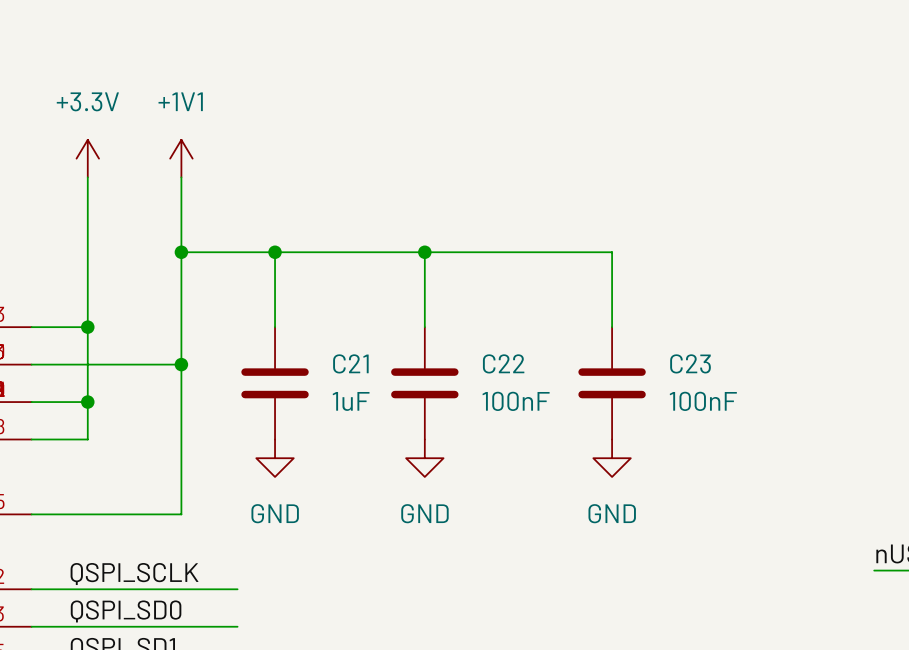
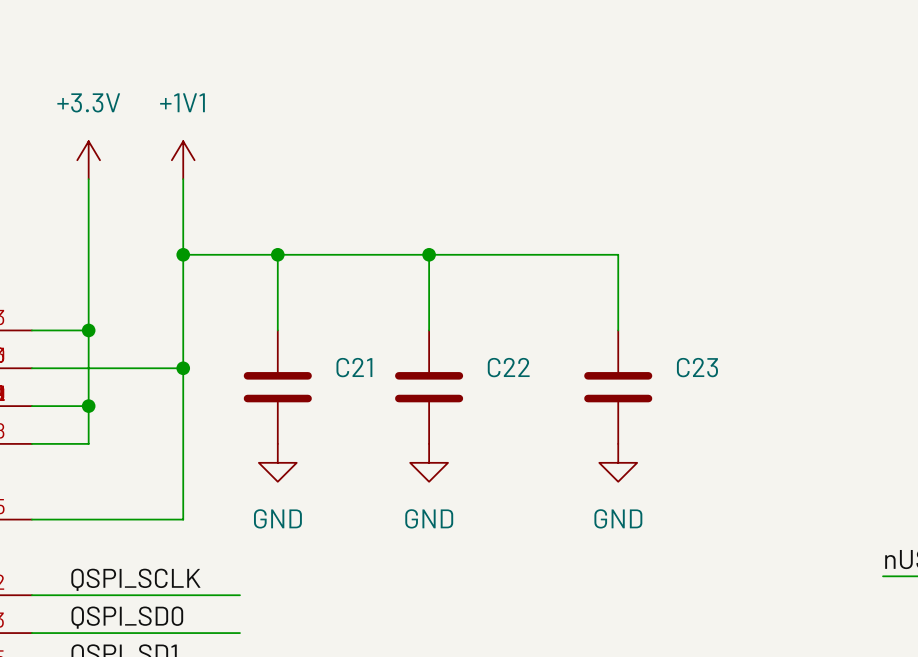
C21 value: 1uF (351, 401) -> none
C22 value: 100nF (516, 401) -> none
C23 value: 100nF (703, 401) -> none

